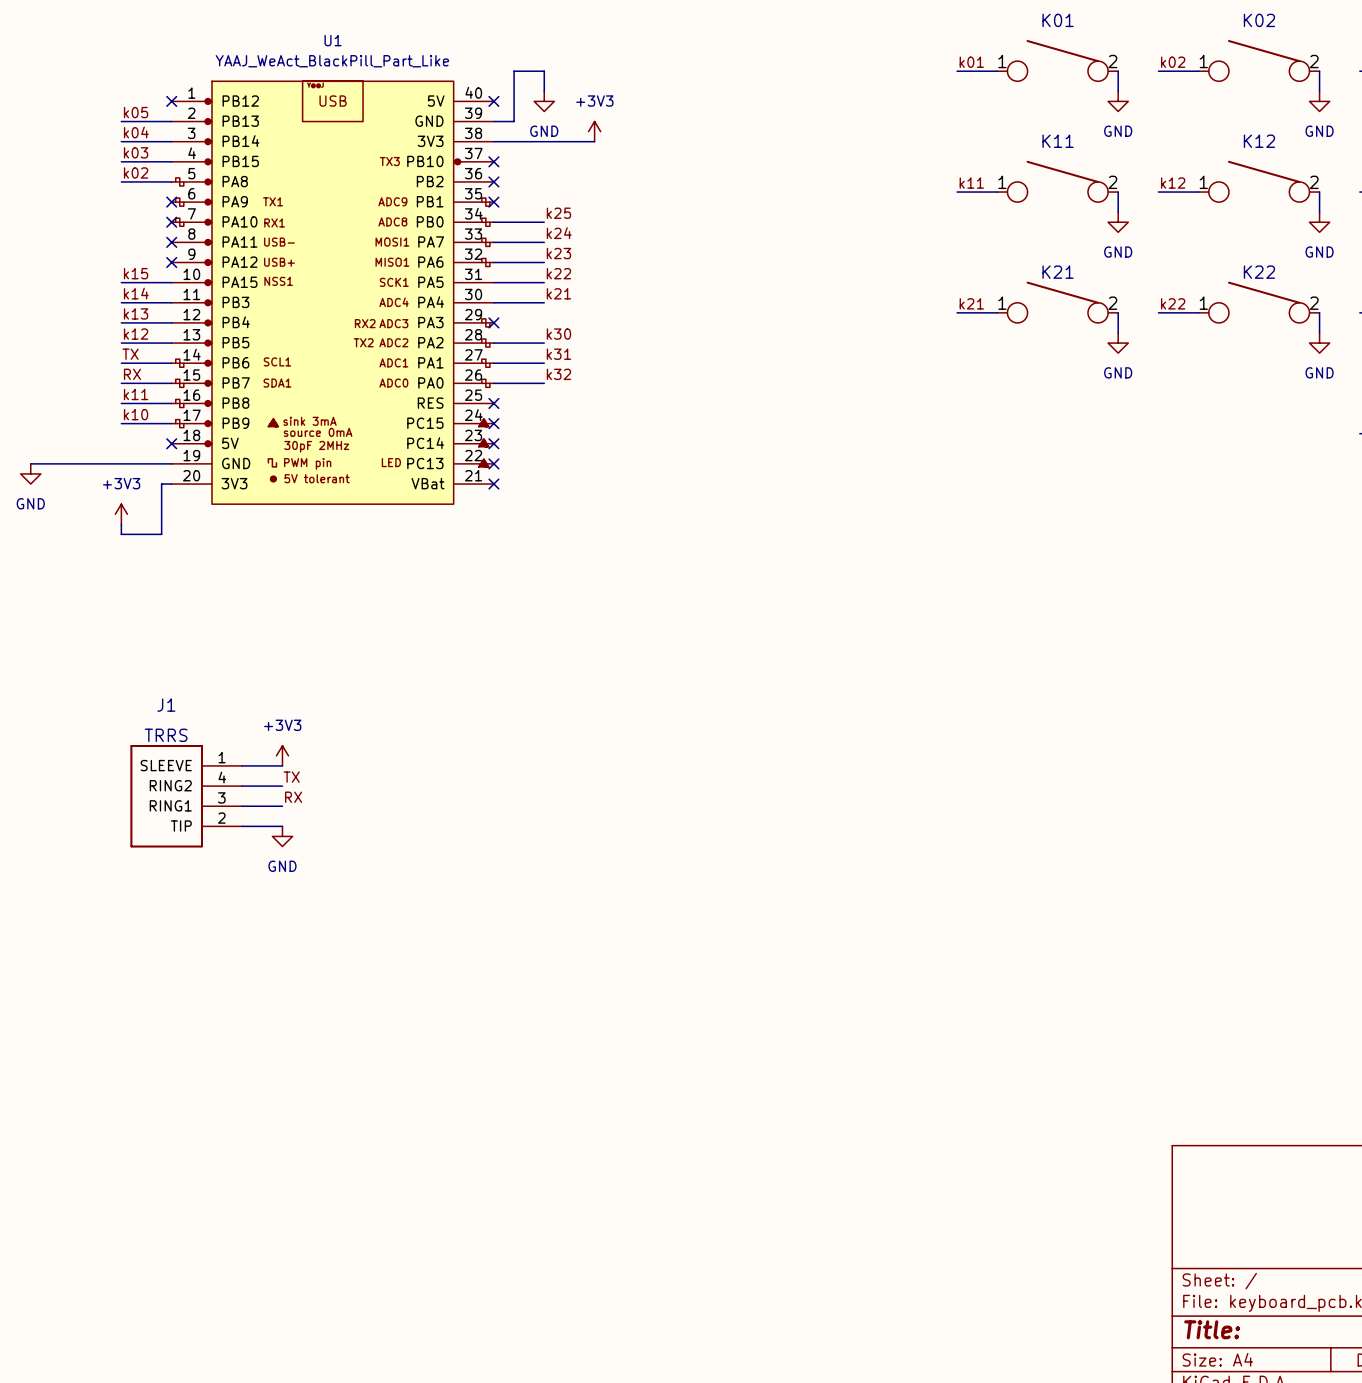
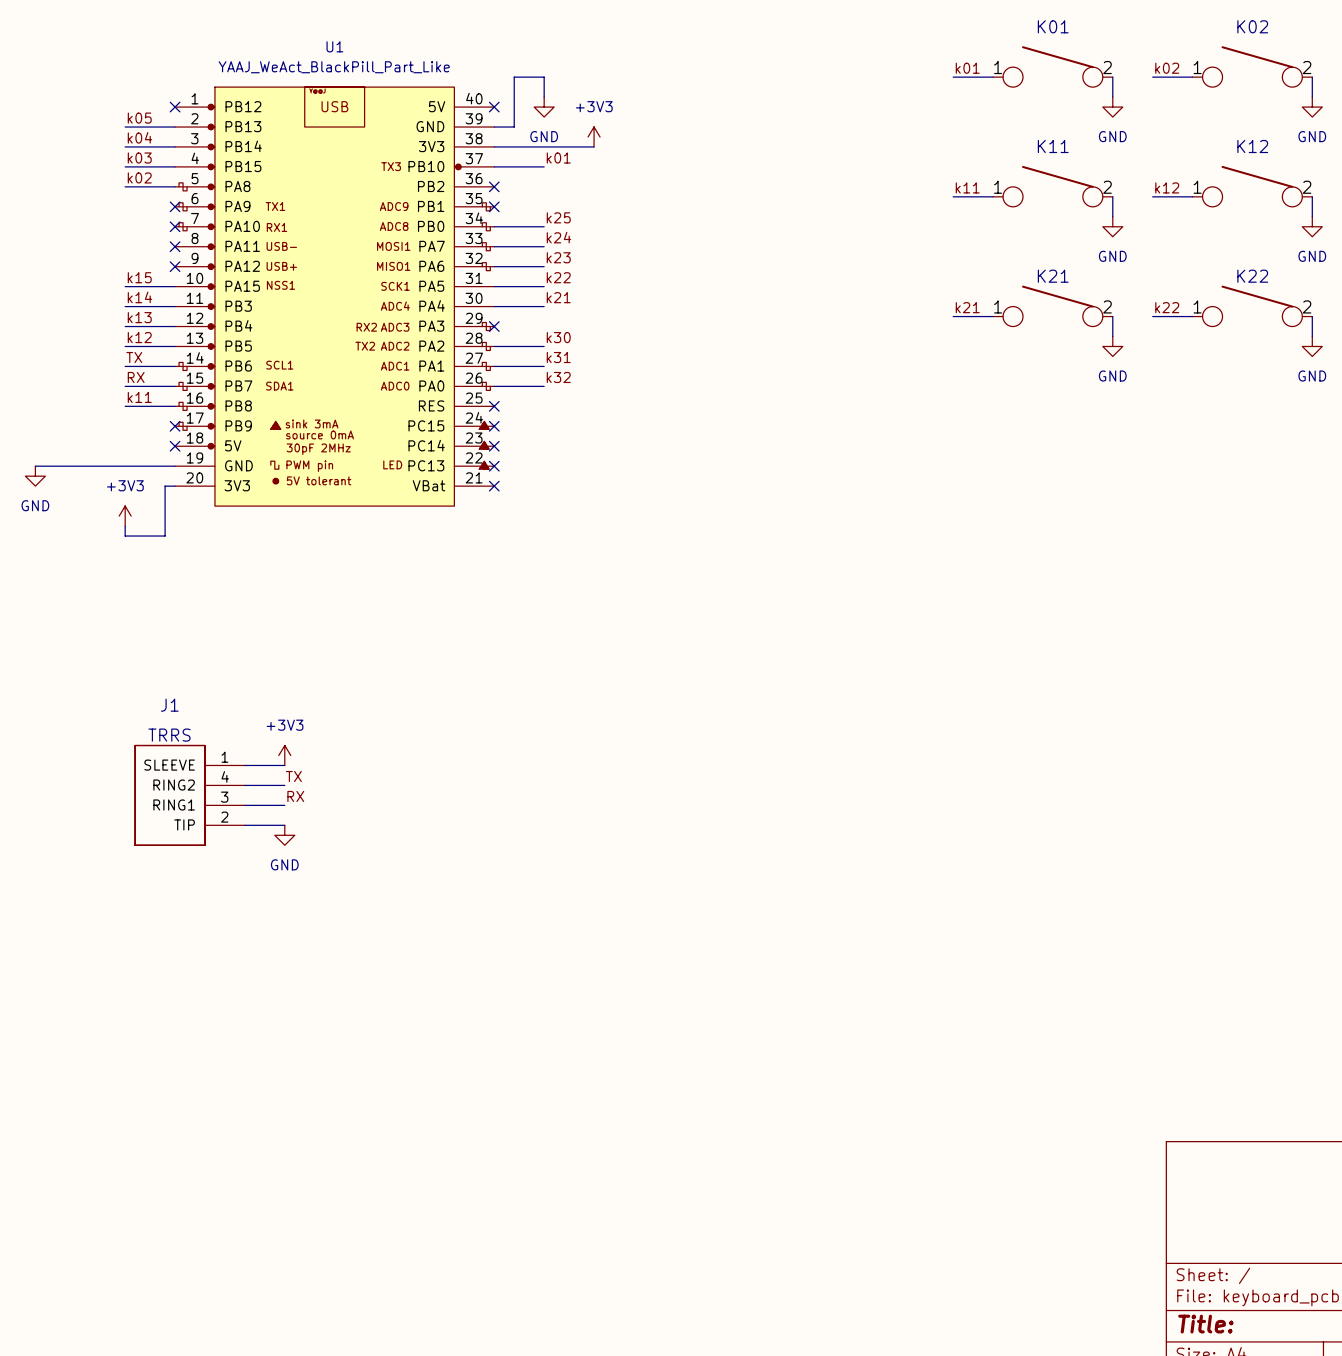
label: none -> k01 (558, 158)
wire: none -> (494, 166) (544, 166)
no-connect mark: (493, 161) -> none
label: k10 (136, 414) -> none
wire: (121, 423) (171, 423) -> none
no-connect mark: none -> (175, 426)

